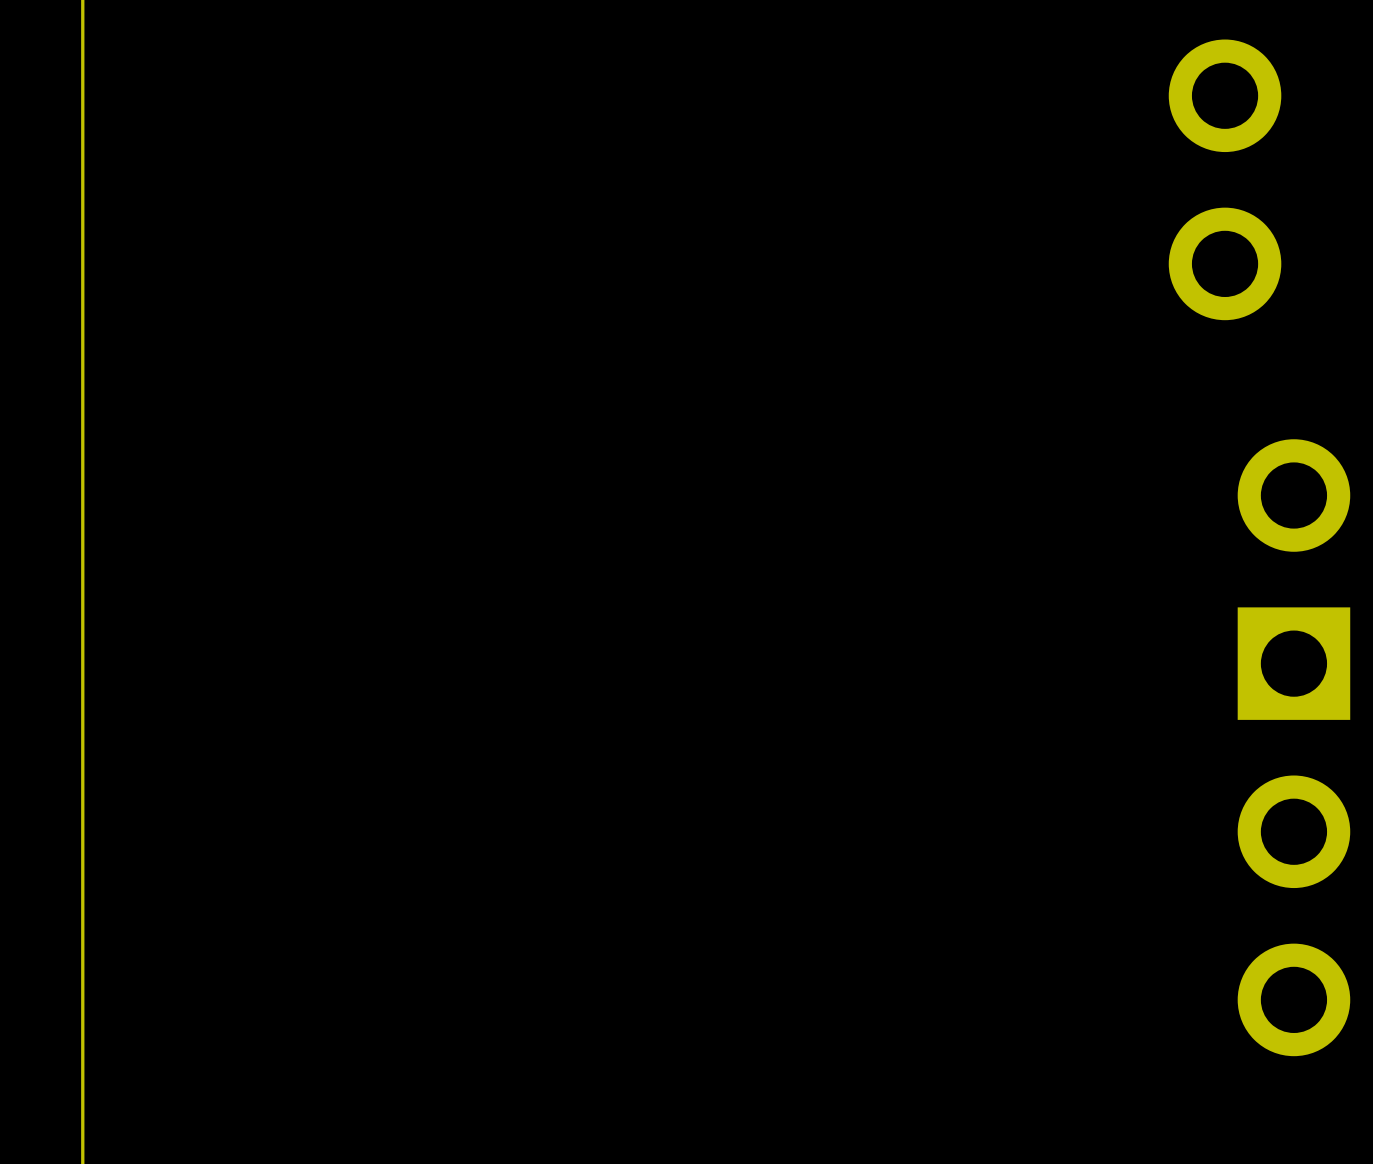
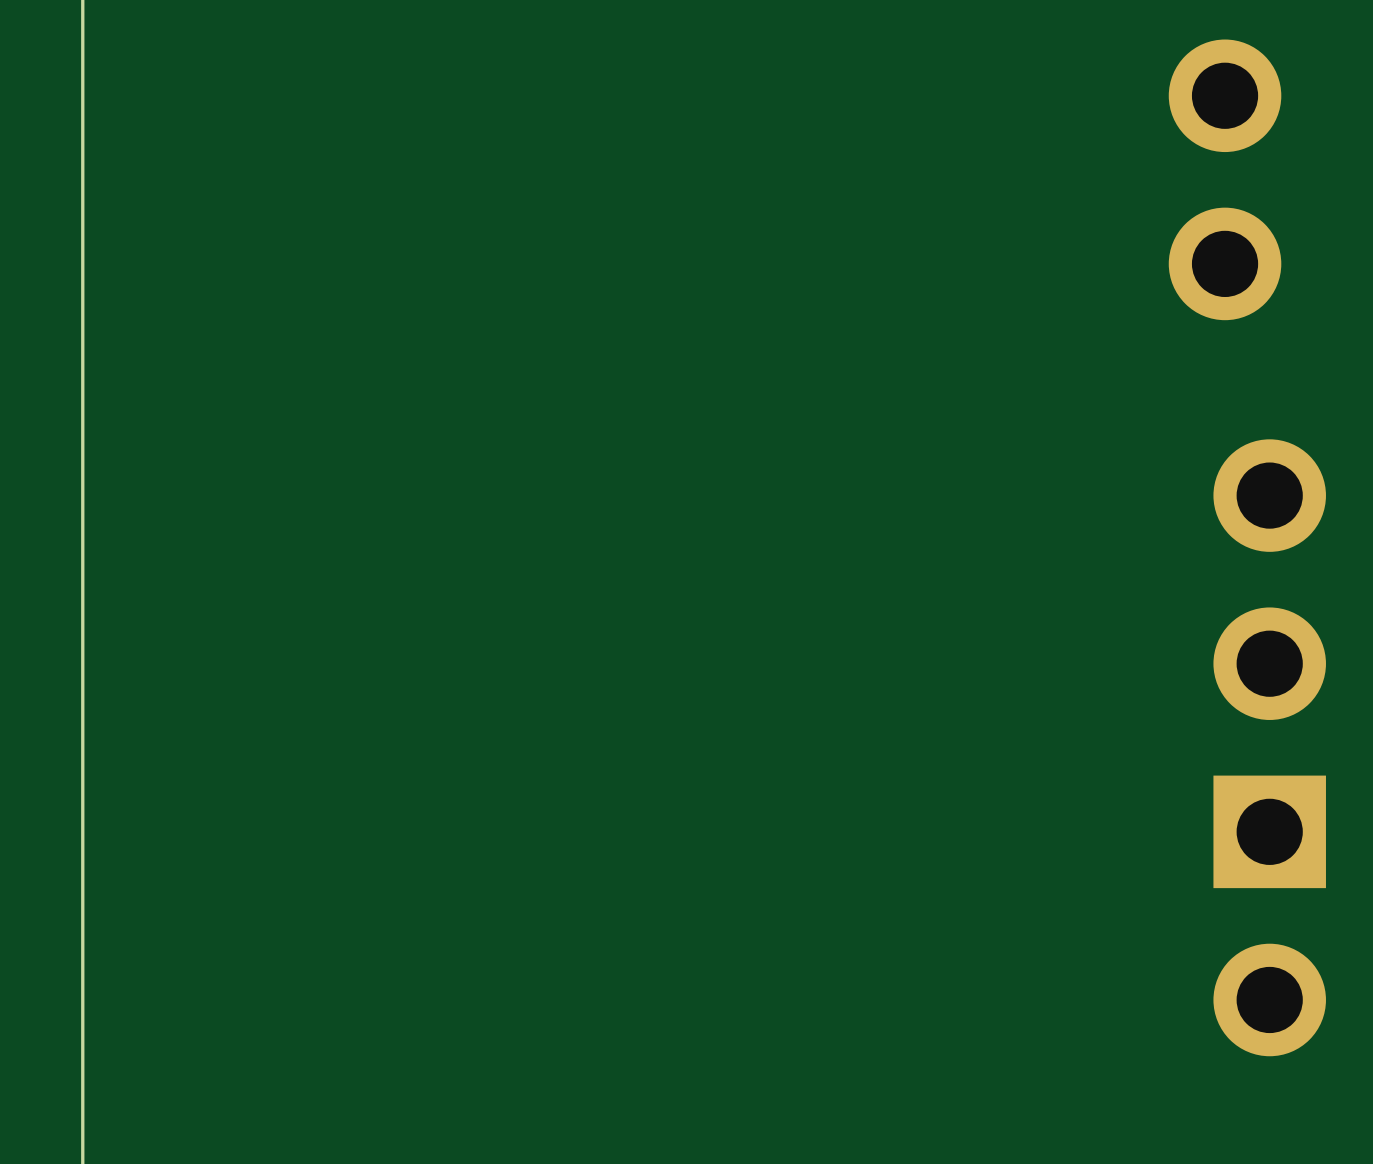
part rotation: 0° (1293, 747) -> 180° (1269, 747)

